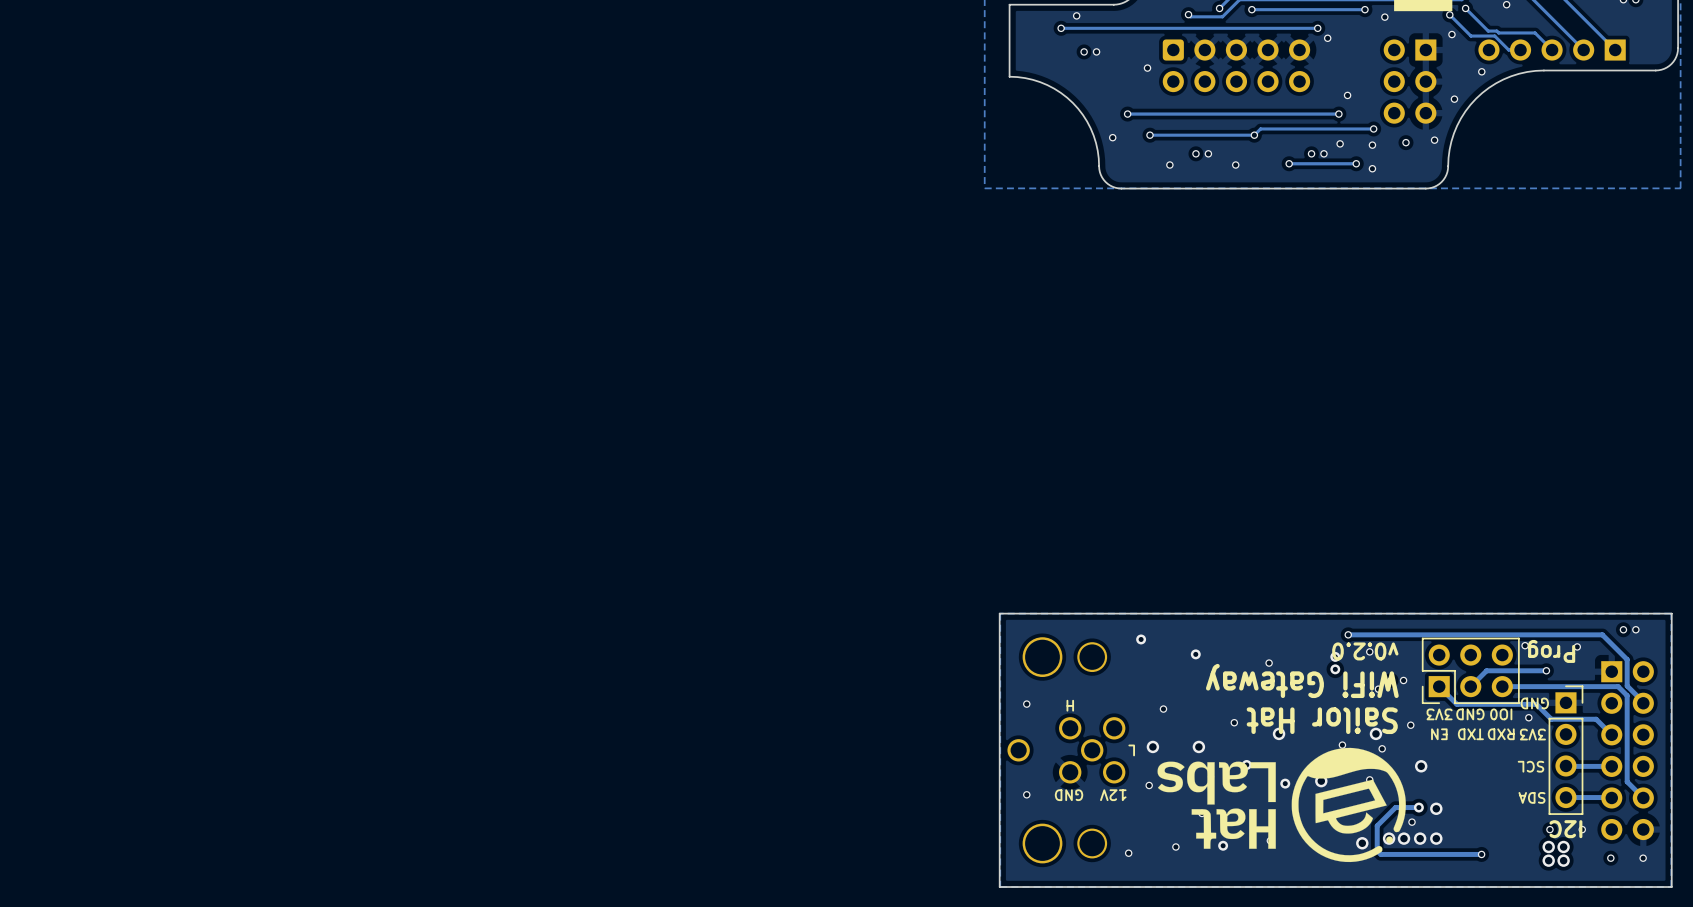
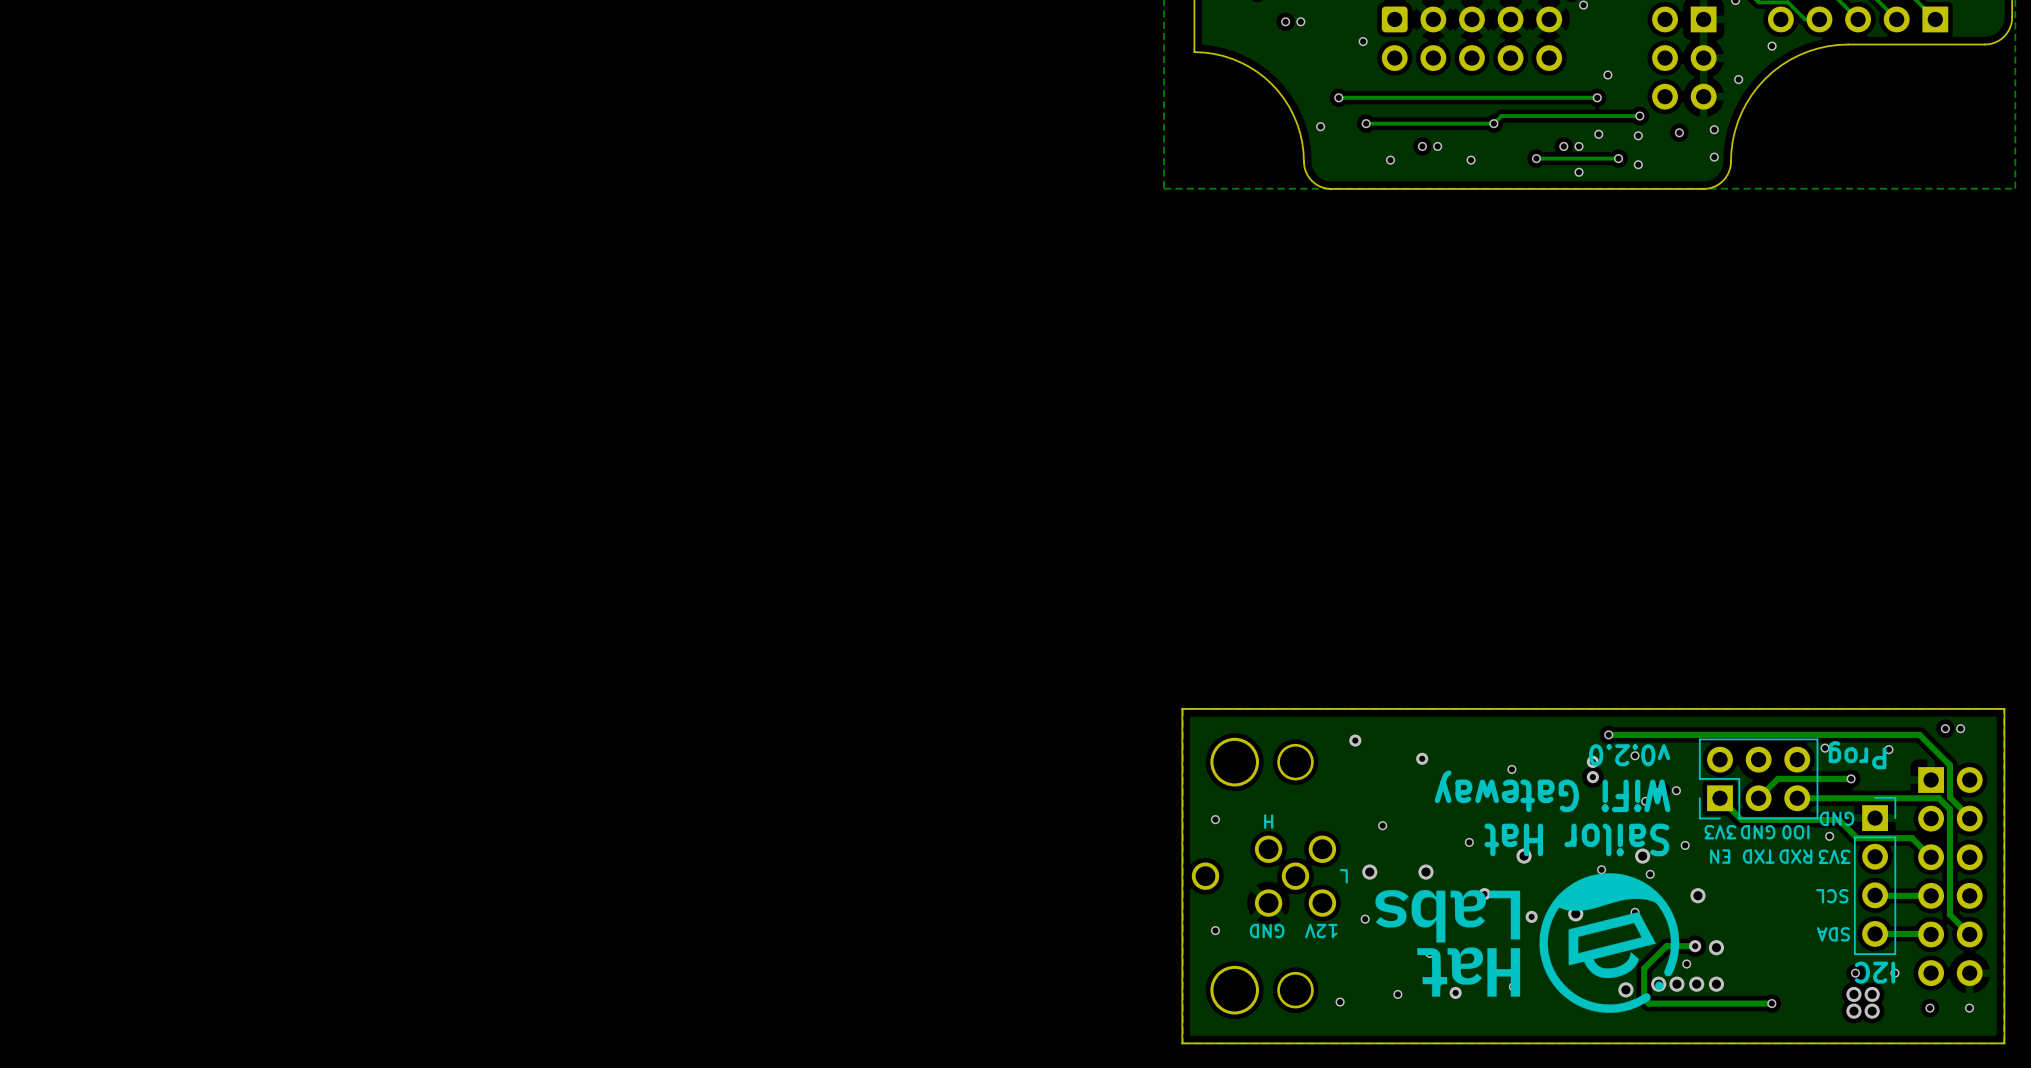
via: none -> (1714, 157)
via: none -> (1579, 172)

